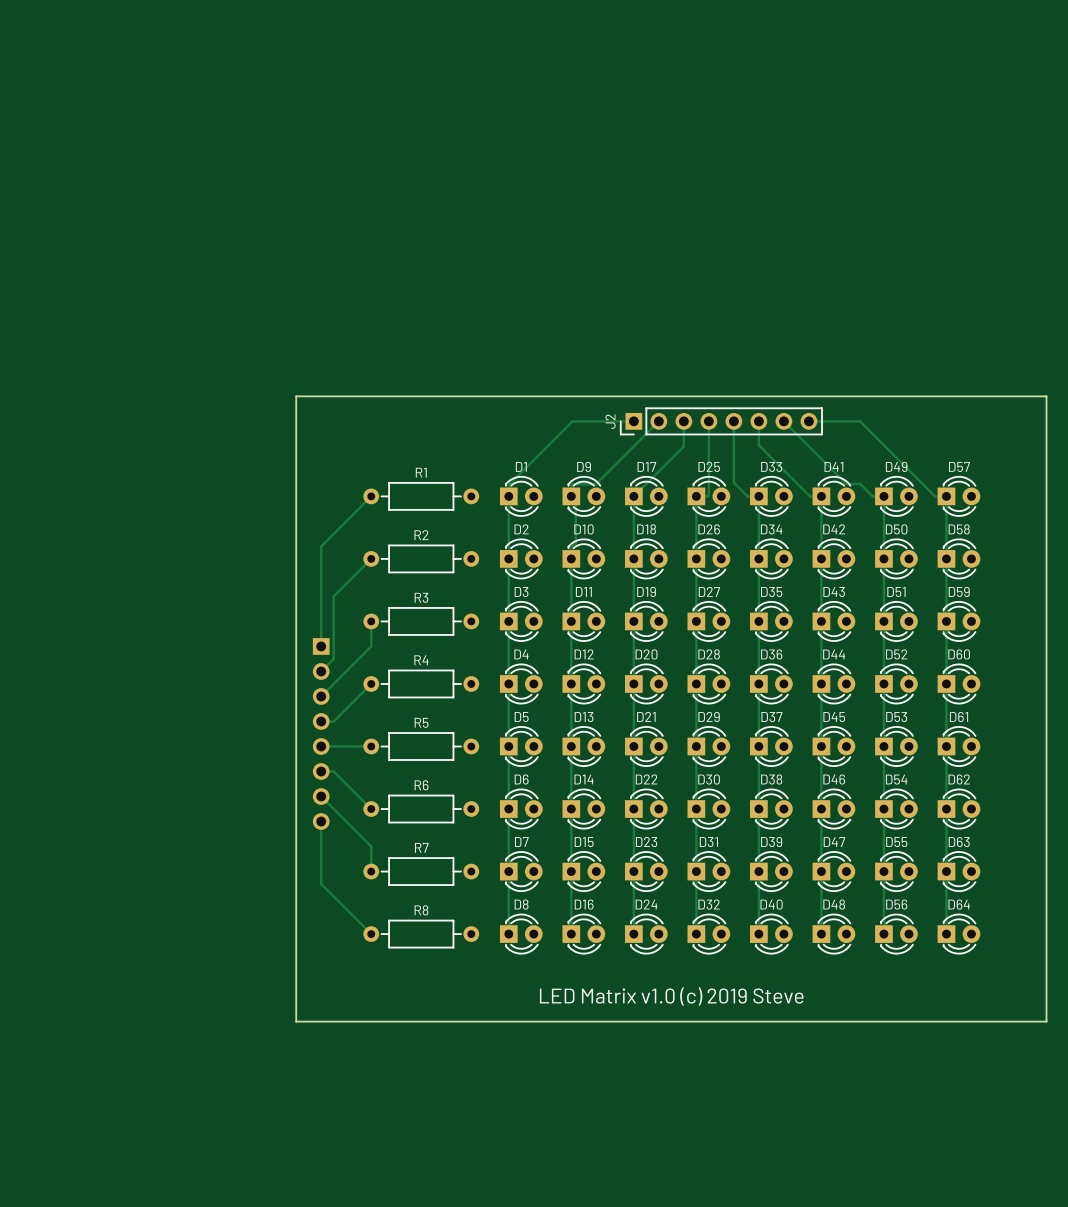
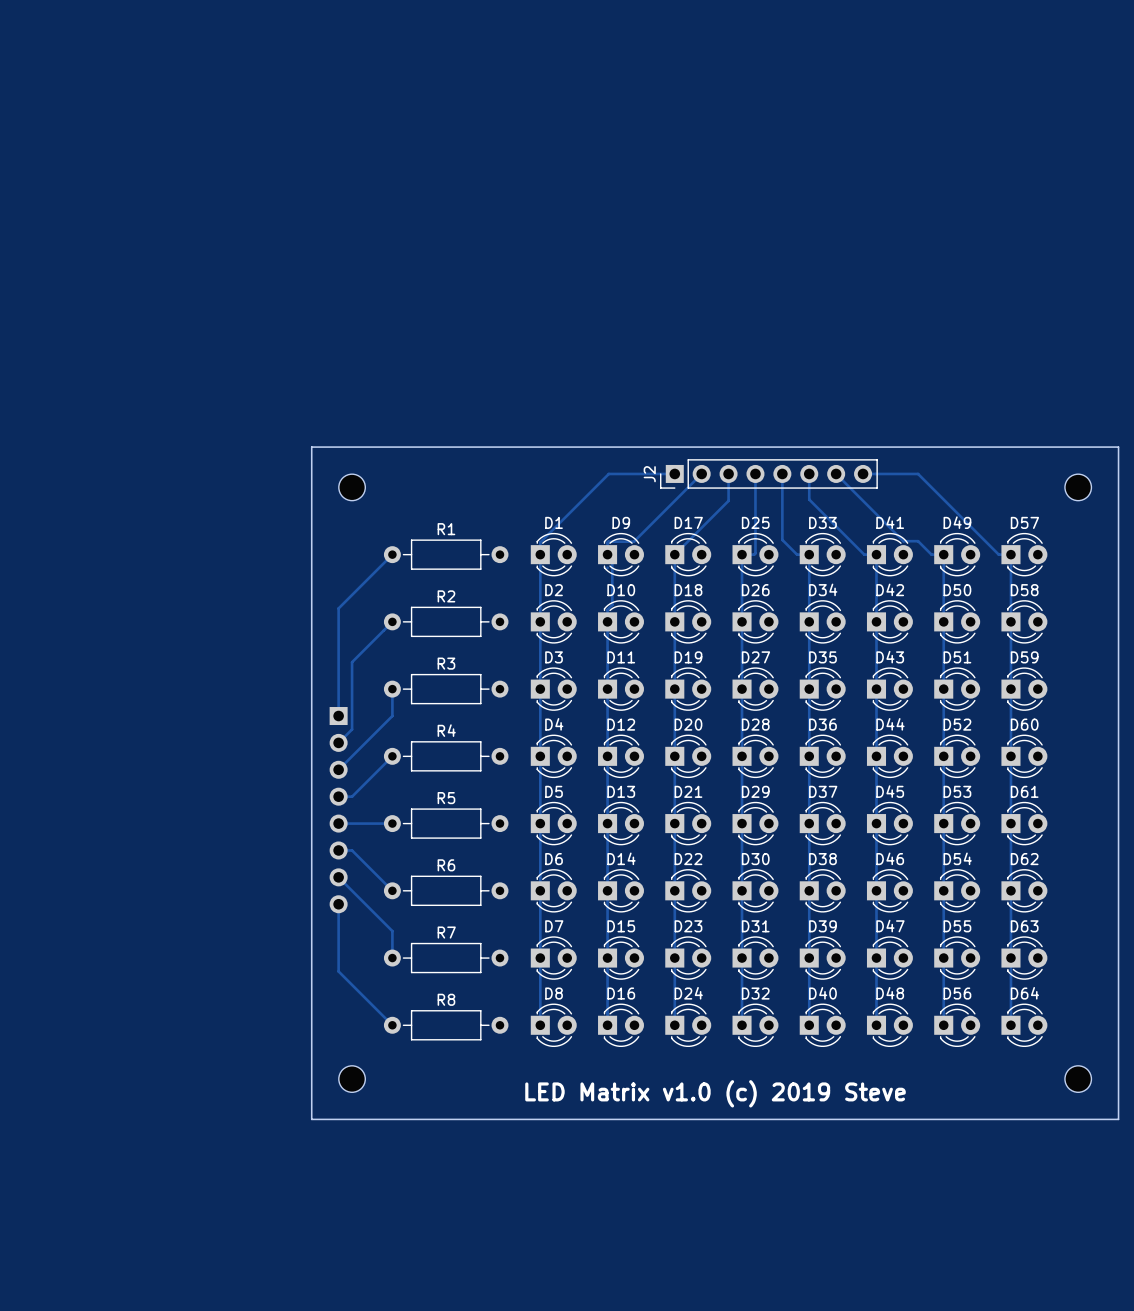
part: none -> (352, 487)
part: none -> (1078, 487)
part: none -> (352, 1079)
part: none -> (1078, 1079)

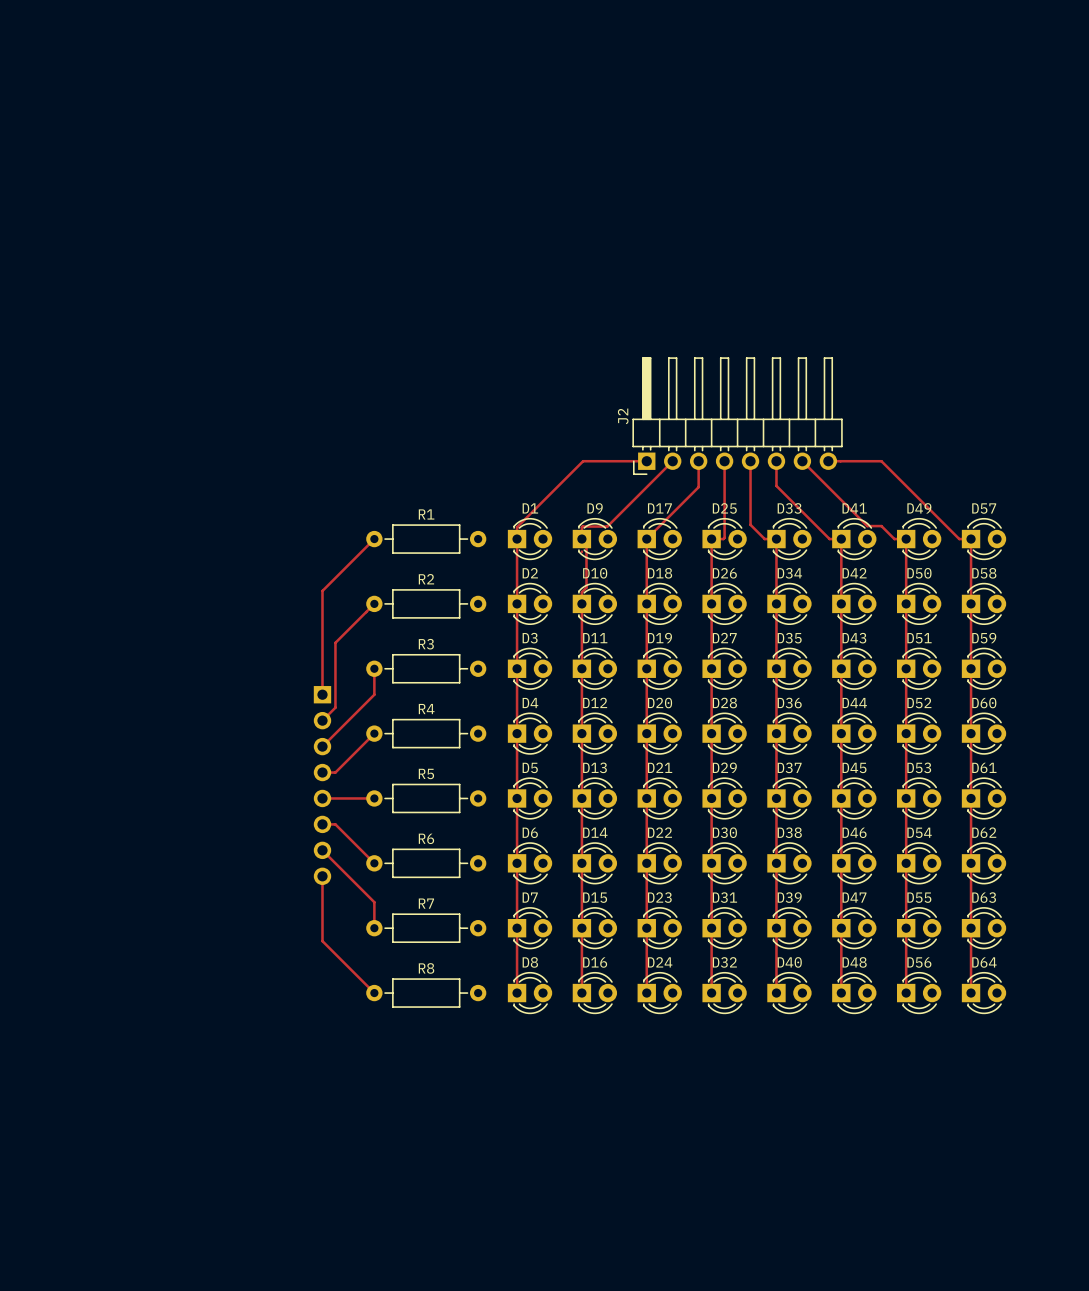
board edge: (311, 447) (311, 1119) (1118, 1119) (1118, 447) (311, 447) -> none
J2 footprint: [660, 459, 878, 489] -> [632, 357, 843, 475]
part: (352, 487) -> none
part: (1078, 487) -> none
part: (352, 1079) -> none
part: (1078, 1079) -> none
text: LED Matrix v1.0 (c) 2019 Steve (715, 1093) -> none

